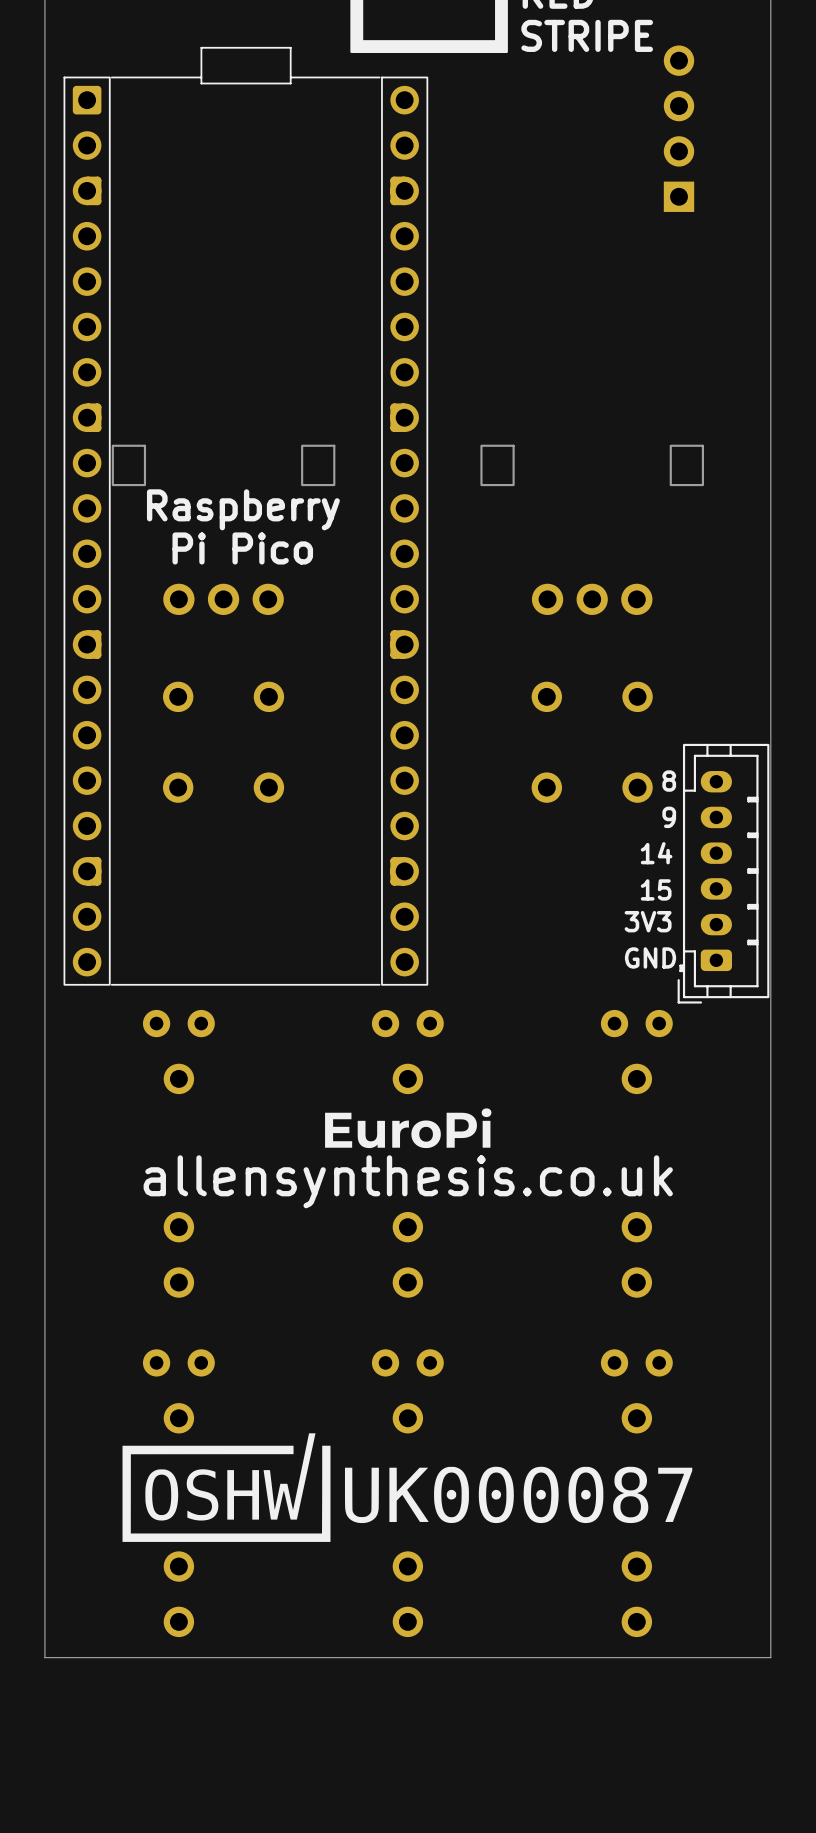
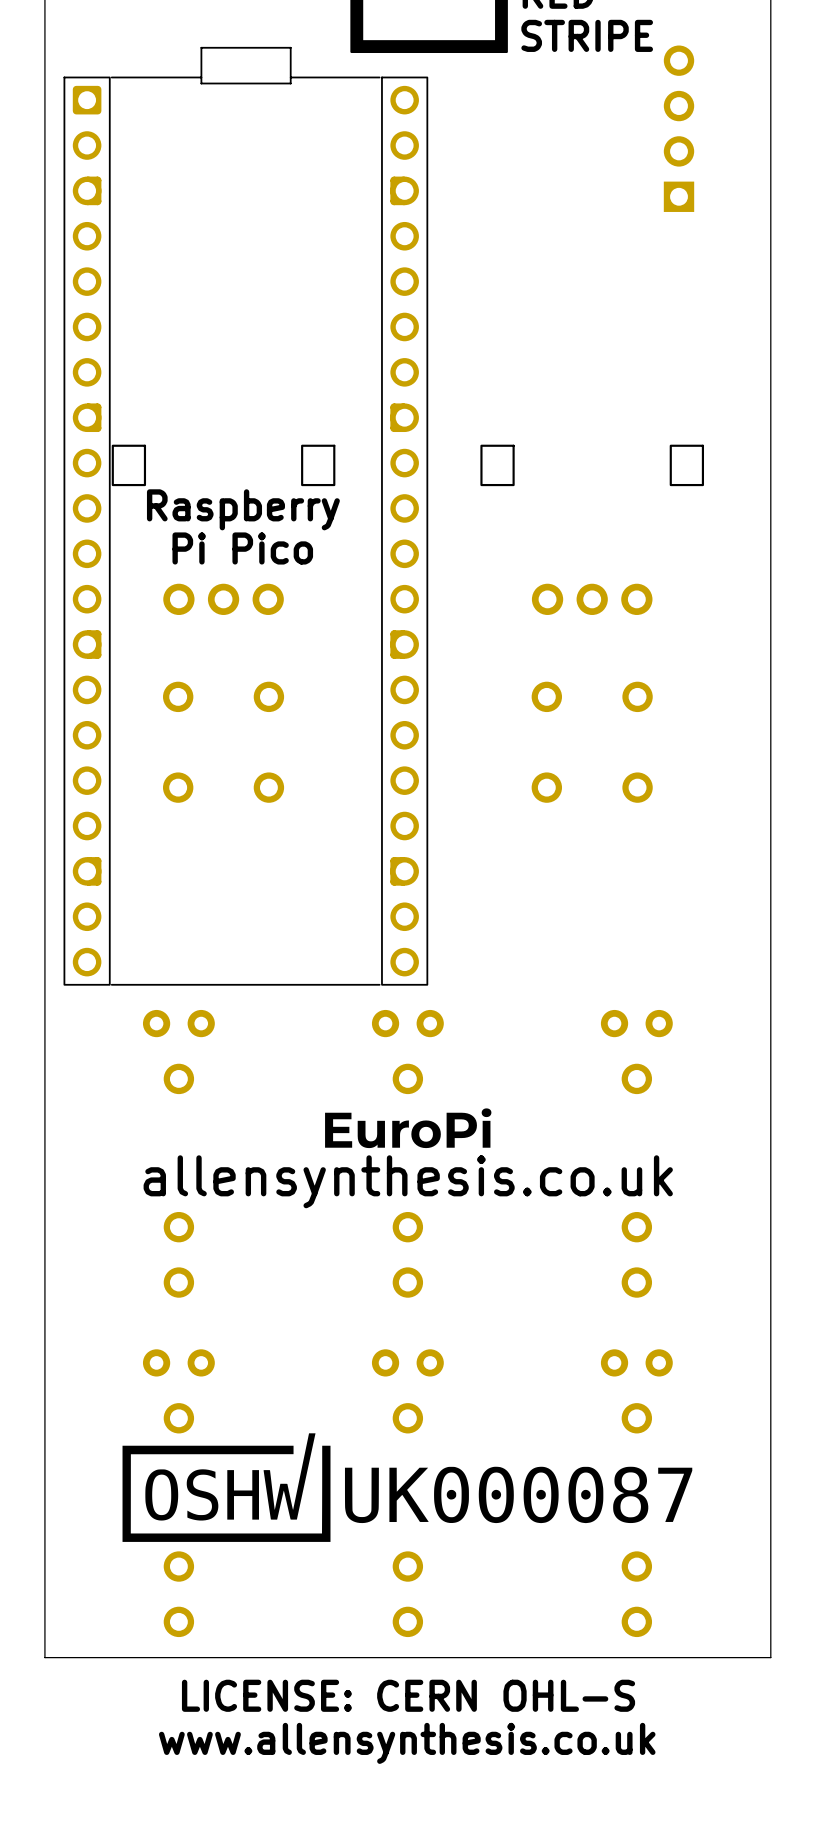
text: 8 (669, 781) -> none
text: 9 (669, 817) -> none
text: 14 (656, 853) -> none
part: (723, 873) -> none
text: 15 (656, 889) -> none
text: 3V3 (648, 921) -> none
text: GND (650, 957) -> none
text: none -> LICENSE: CERN OHL-S (408, 1695)
text: none -> www.allensynthesis.co.uk (407, 1743)

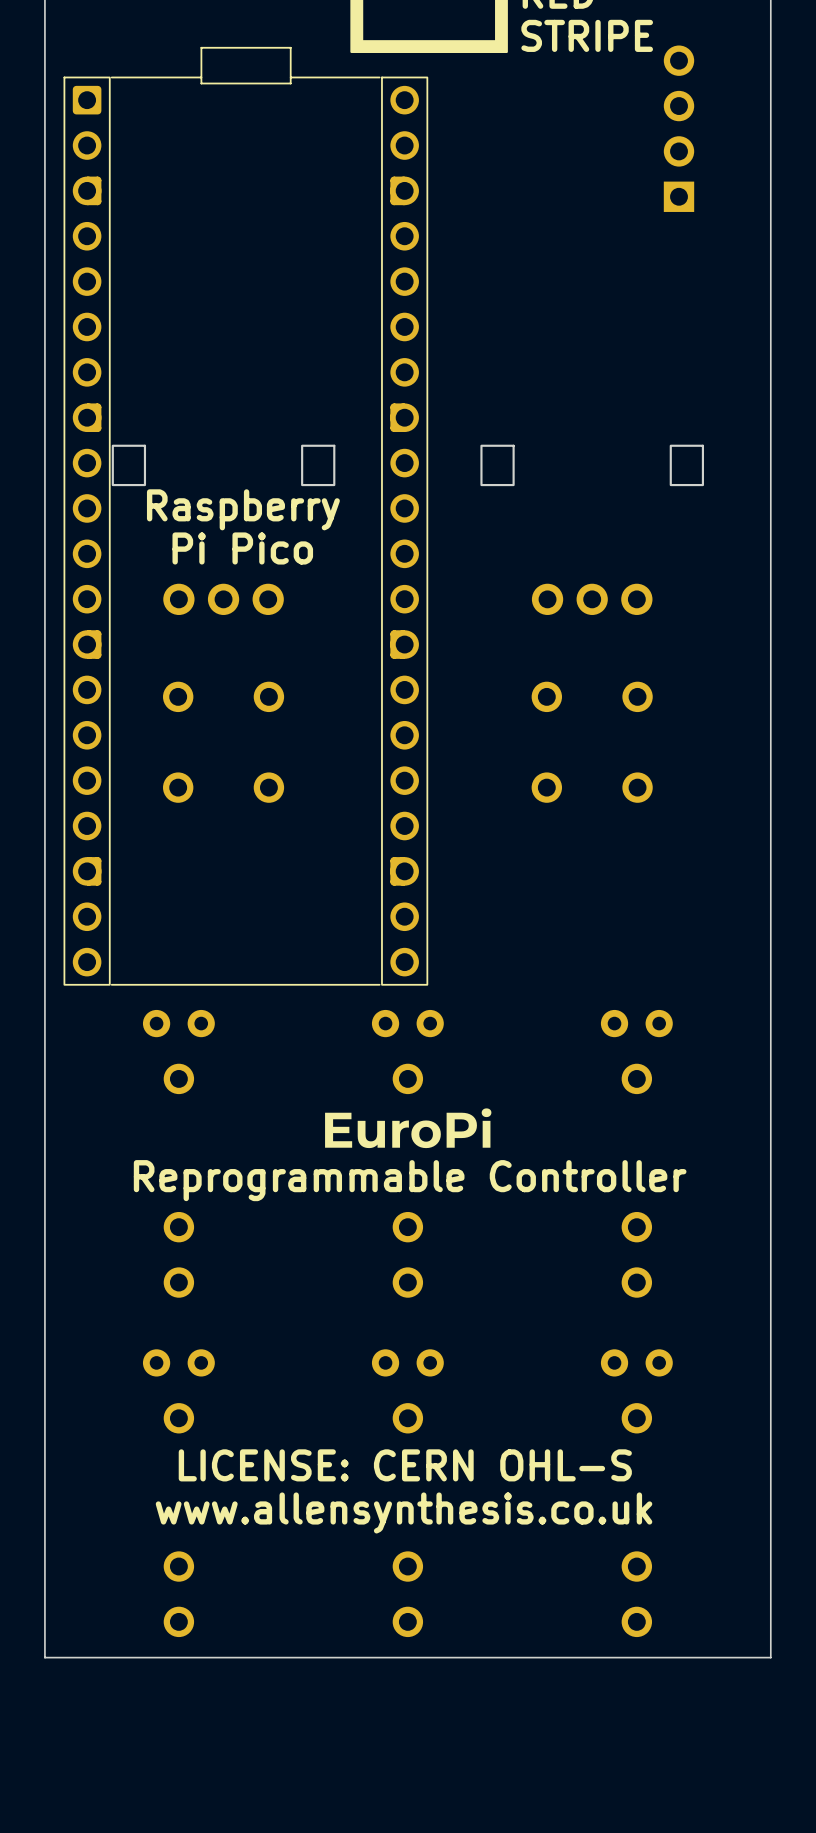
text: allensynthesis.co.uk (408, 1181) -> Reprogrammable Controller (410, 1180)
drawing: [122, 1433, 693, 1542] -> none
text position: LICENSE: CERN OHL-S (408, 1695) -> LICENSE: CERN OHL-S (405, 1465)
text position: www.allensynthesis.co.uk (407, 1743) -> www.allensynthesis.co.uk (404, 1512)

